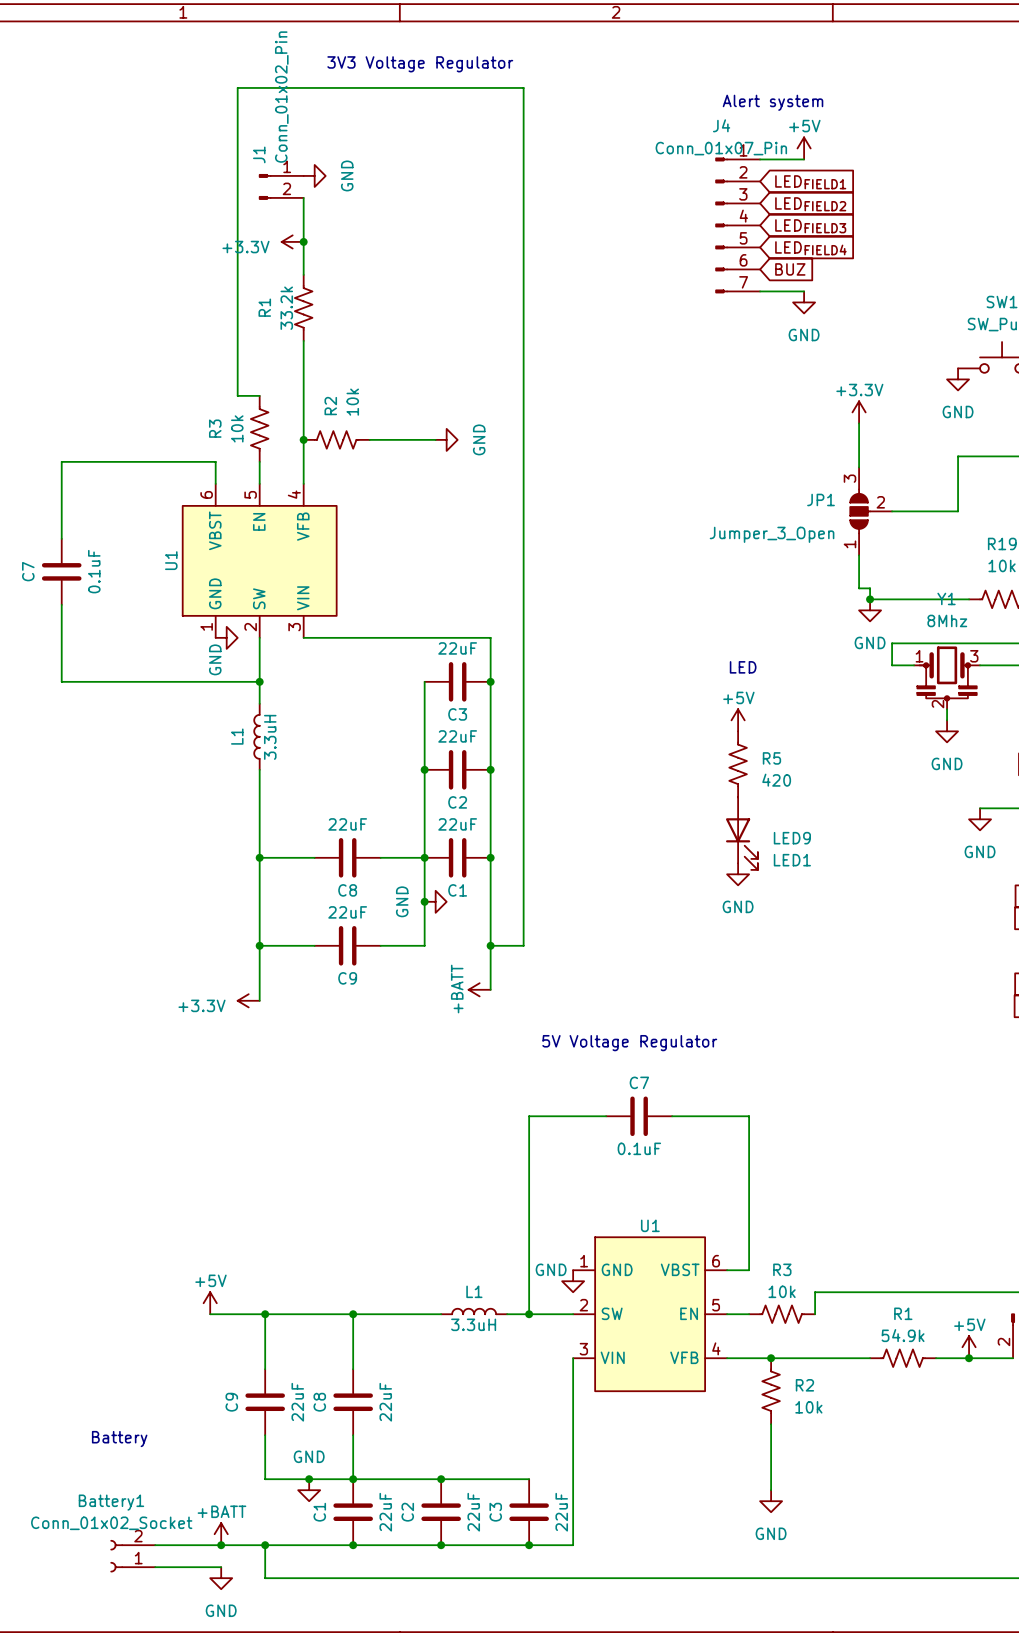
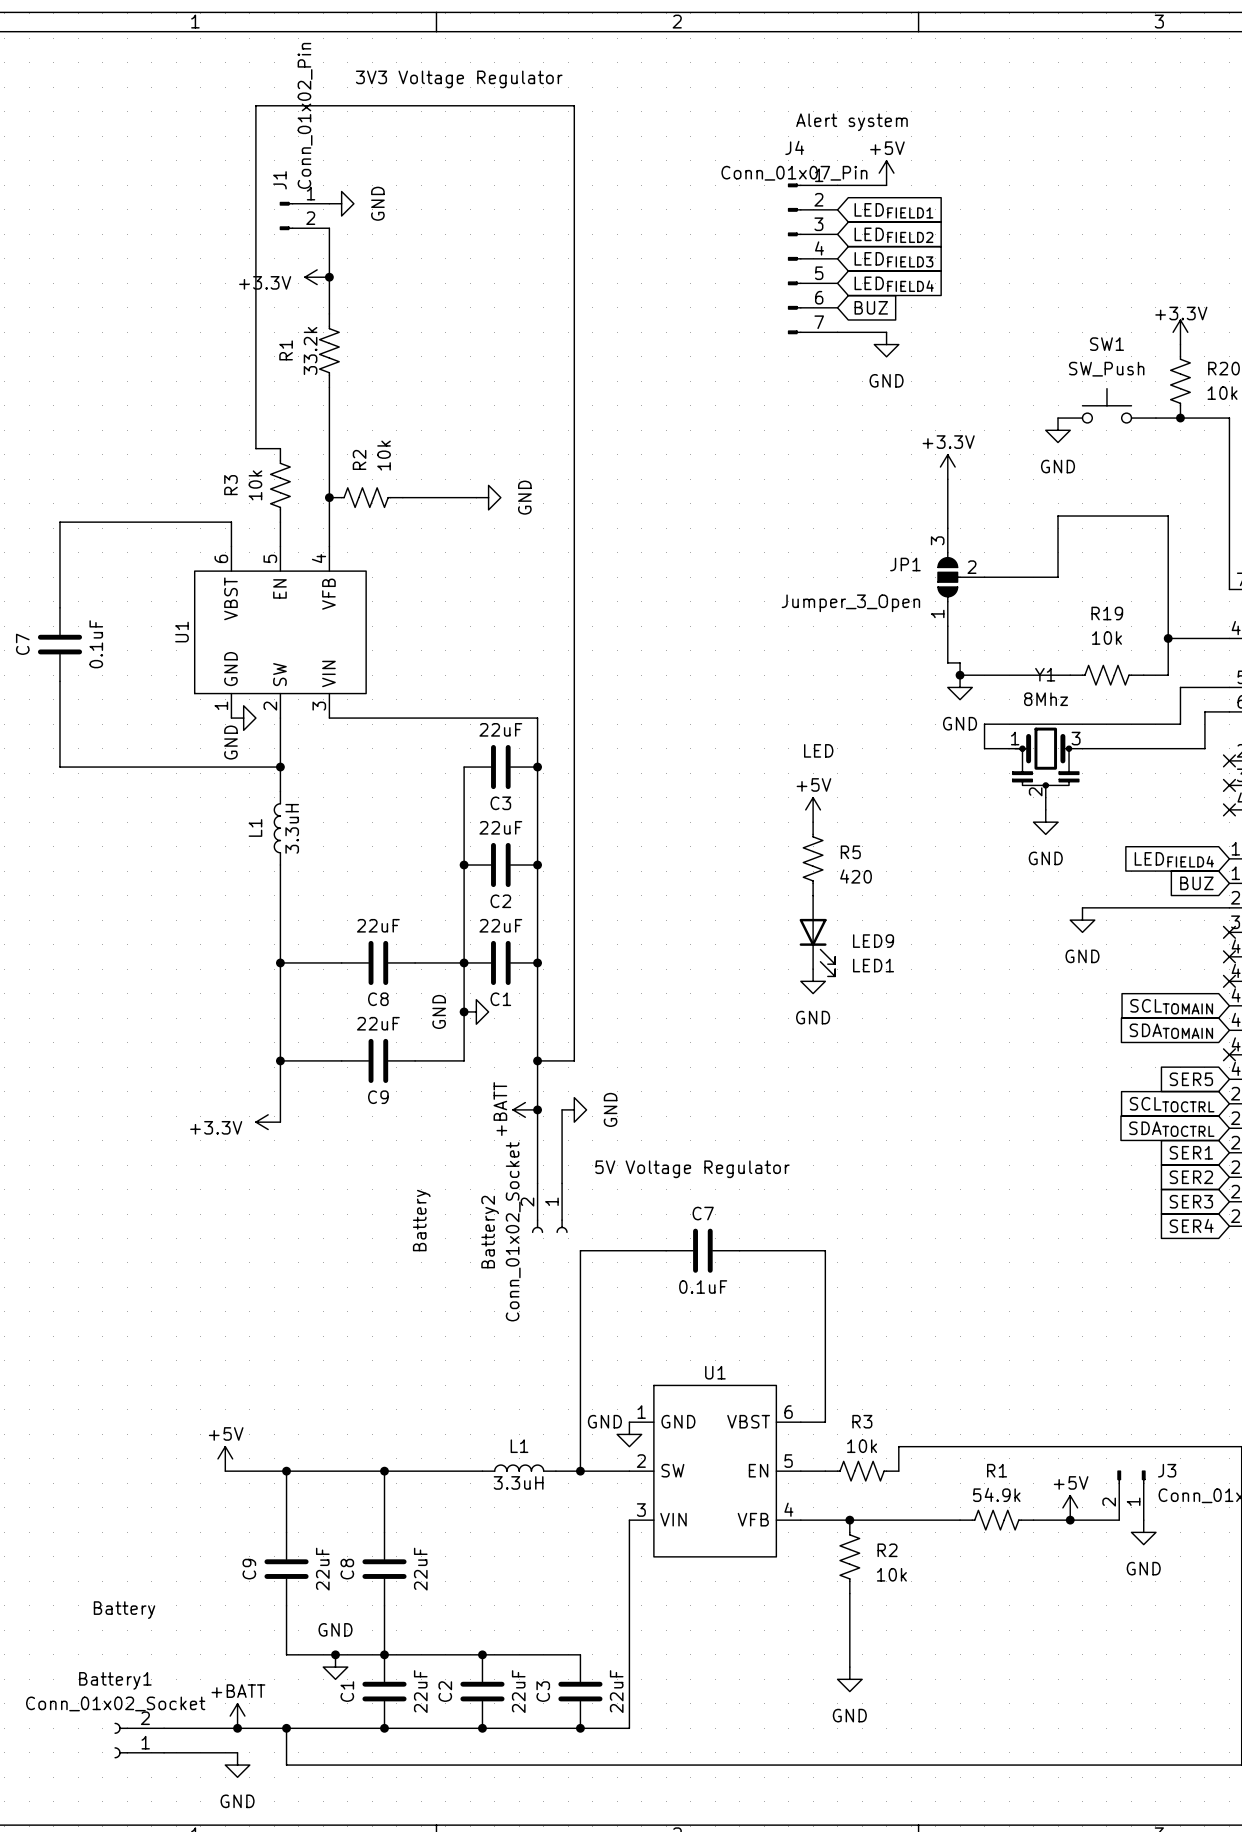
wire: none -> (537, 1109) (537, 1183)
junction: none -> (537, 1109)
wire: none -> (562, 1109) (562, 1183)
power symbol: none -> GND (574, 1109)
Battery2: none -> Conn_01x02_Socket (549, 1208)
text: none -> Battery (421, 1220)

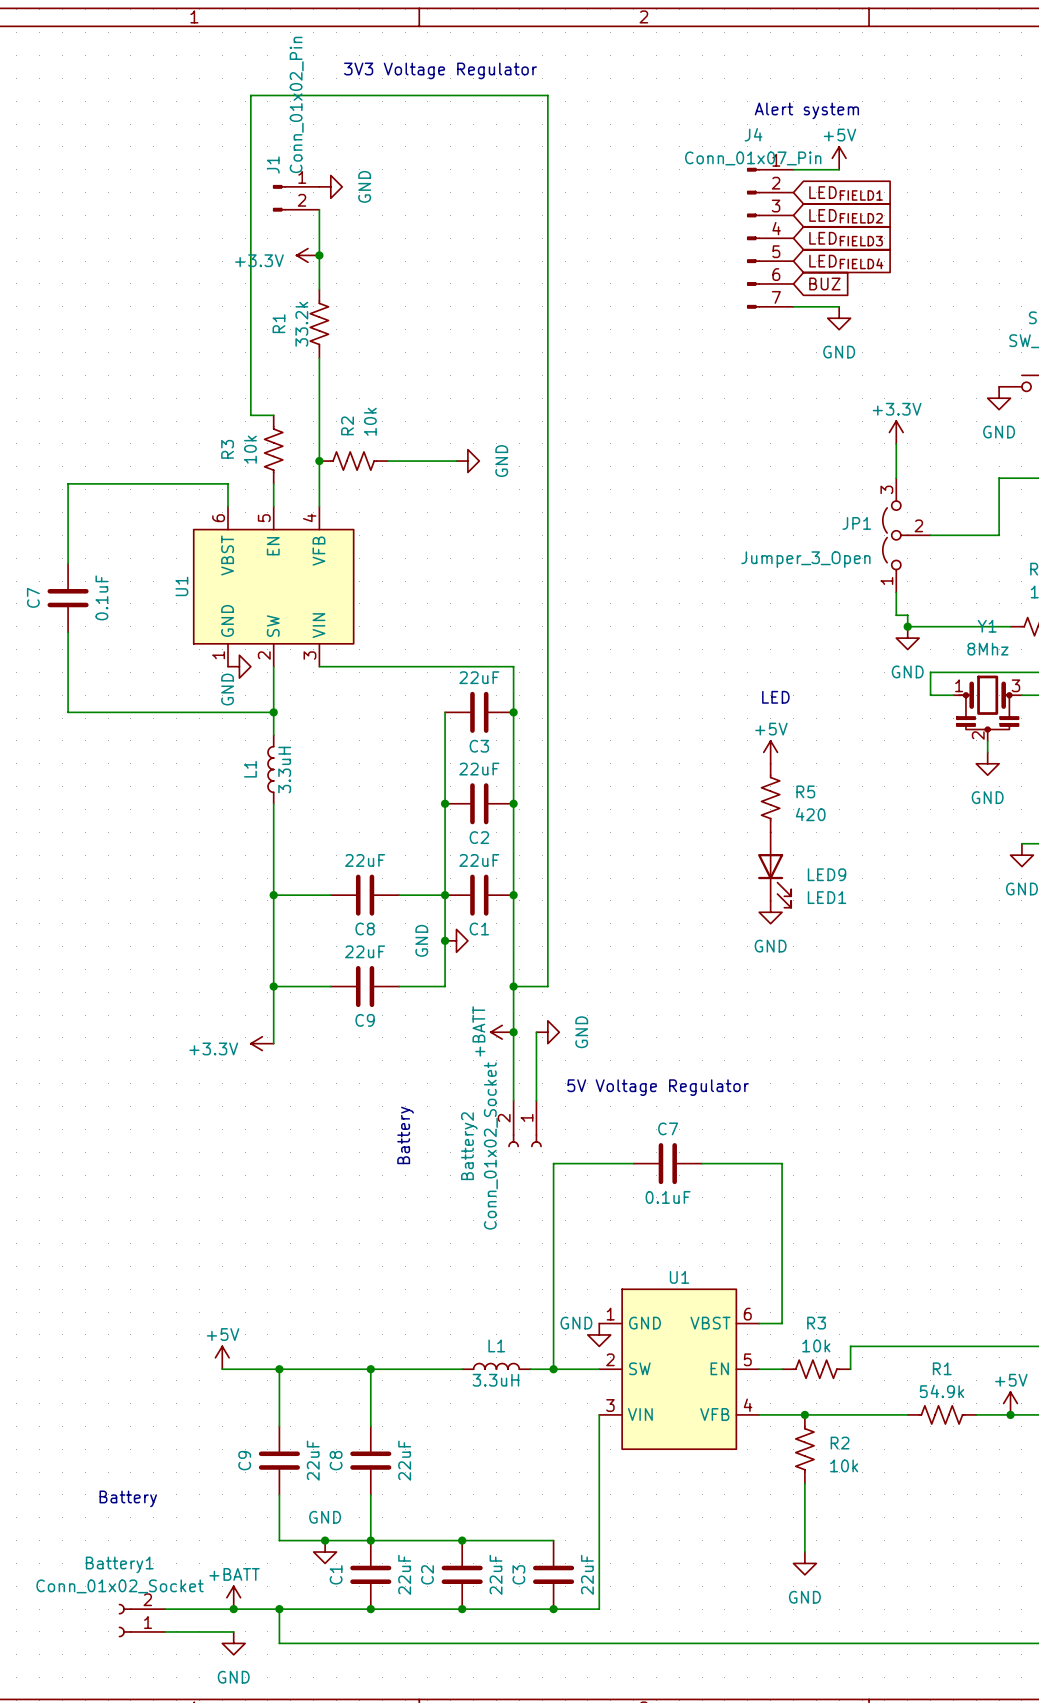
JP1 symbol: [937, 528, 985, 627] -> [882, 478, 931, 593]

